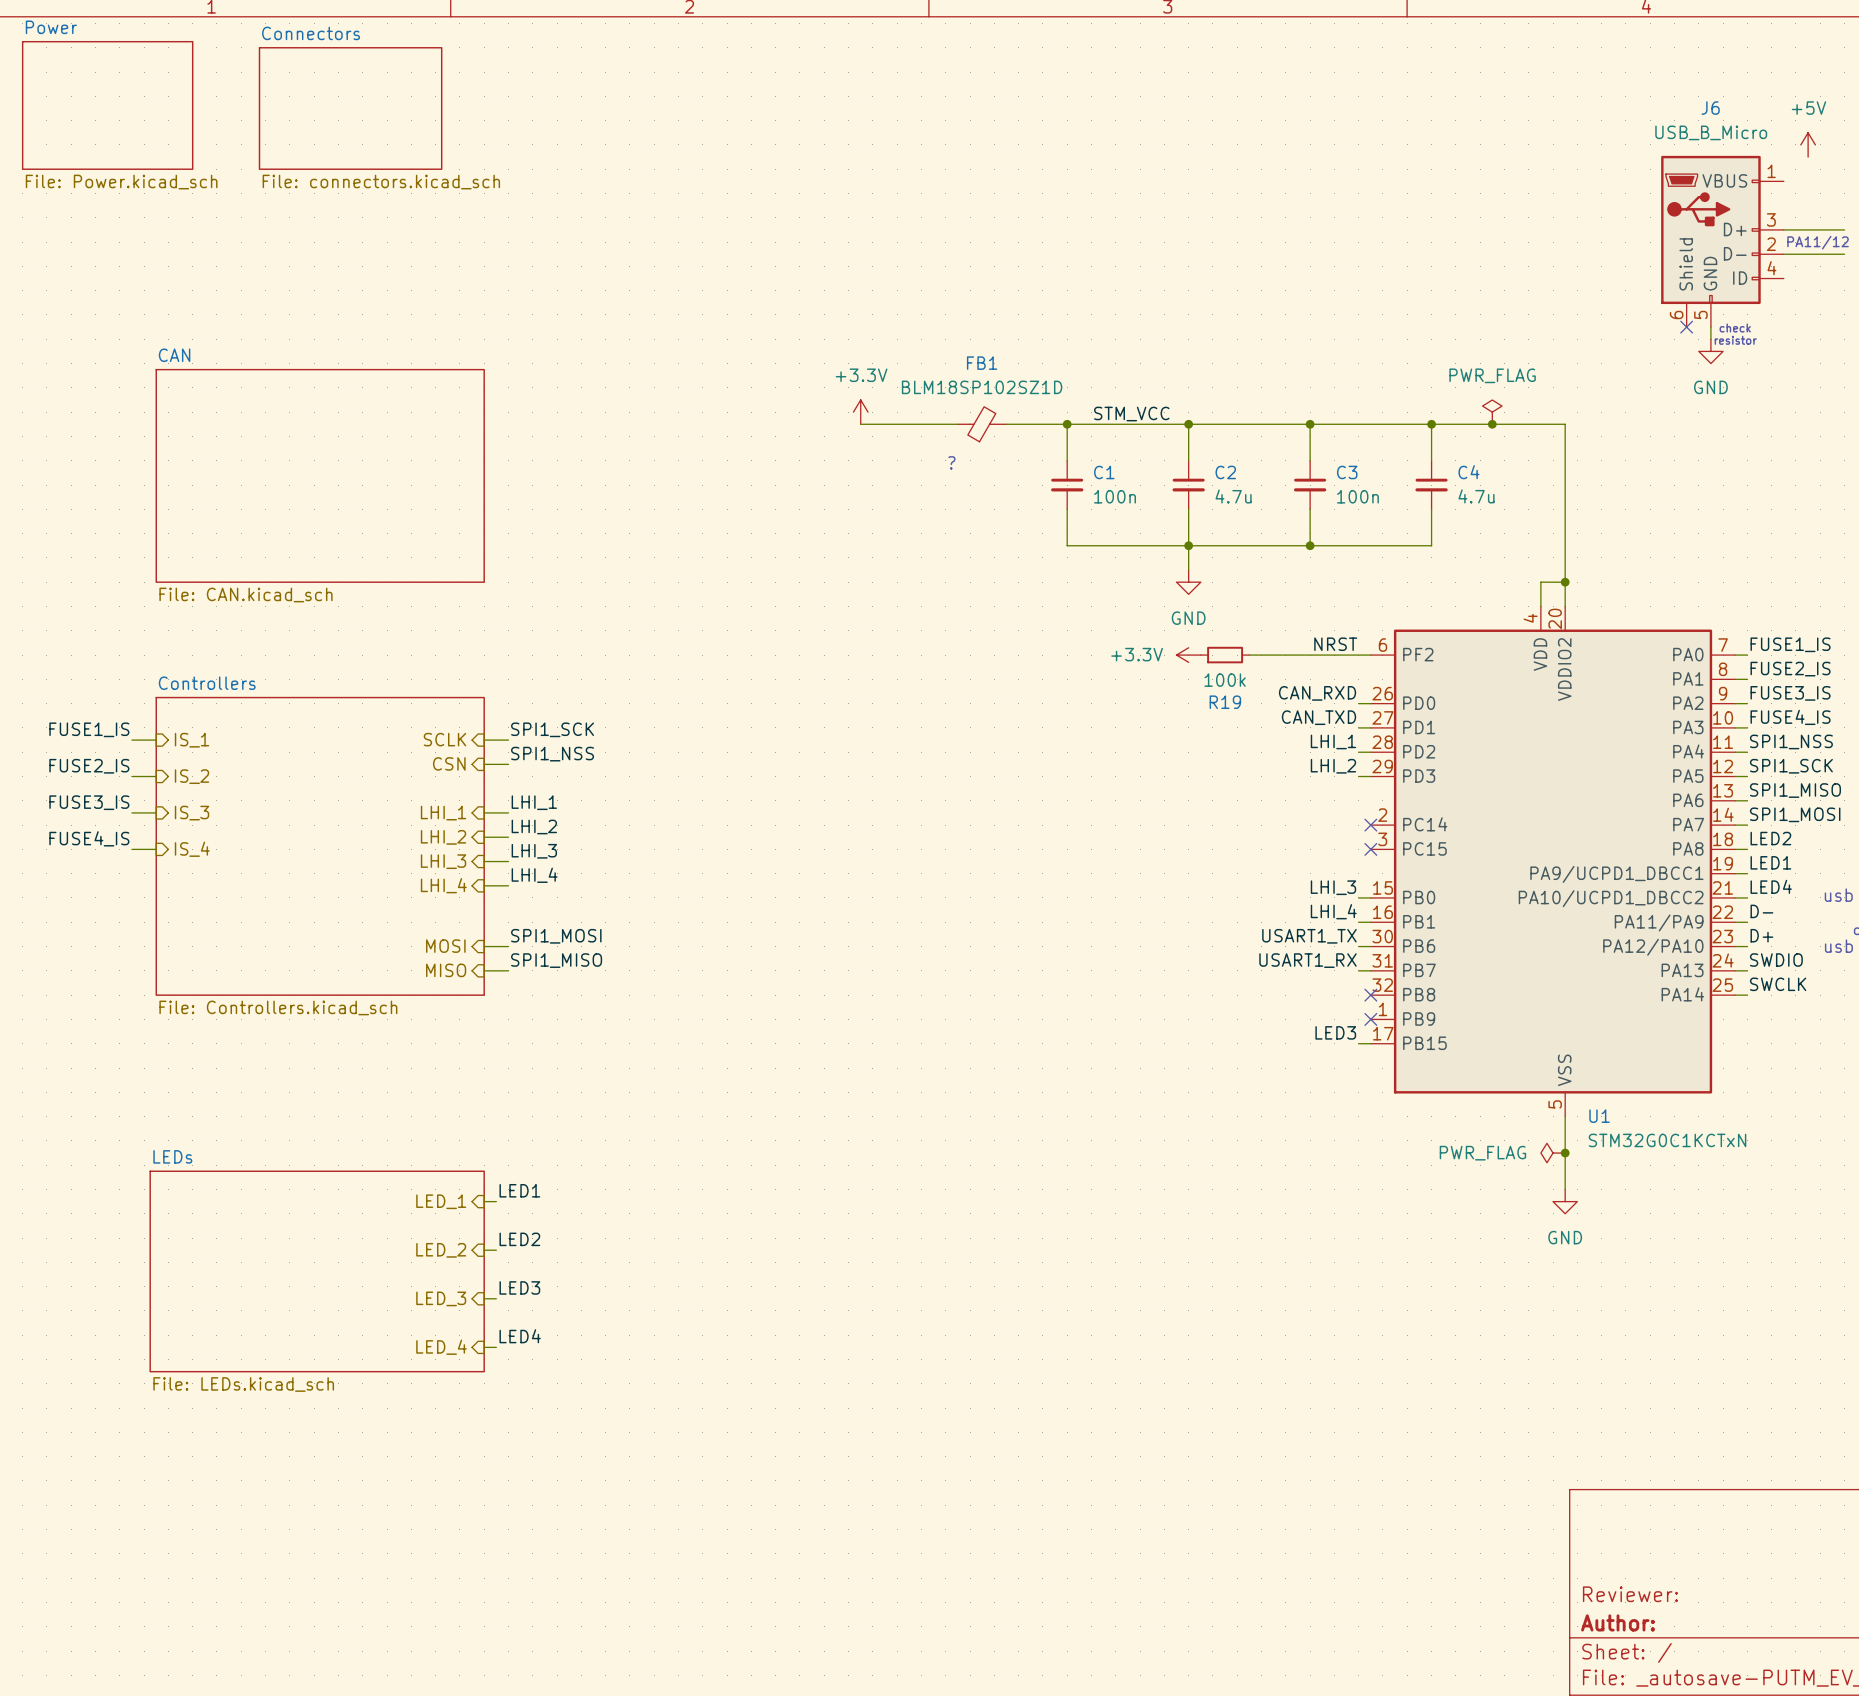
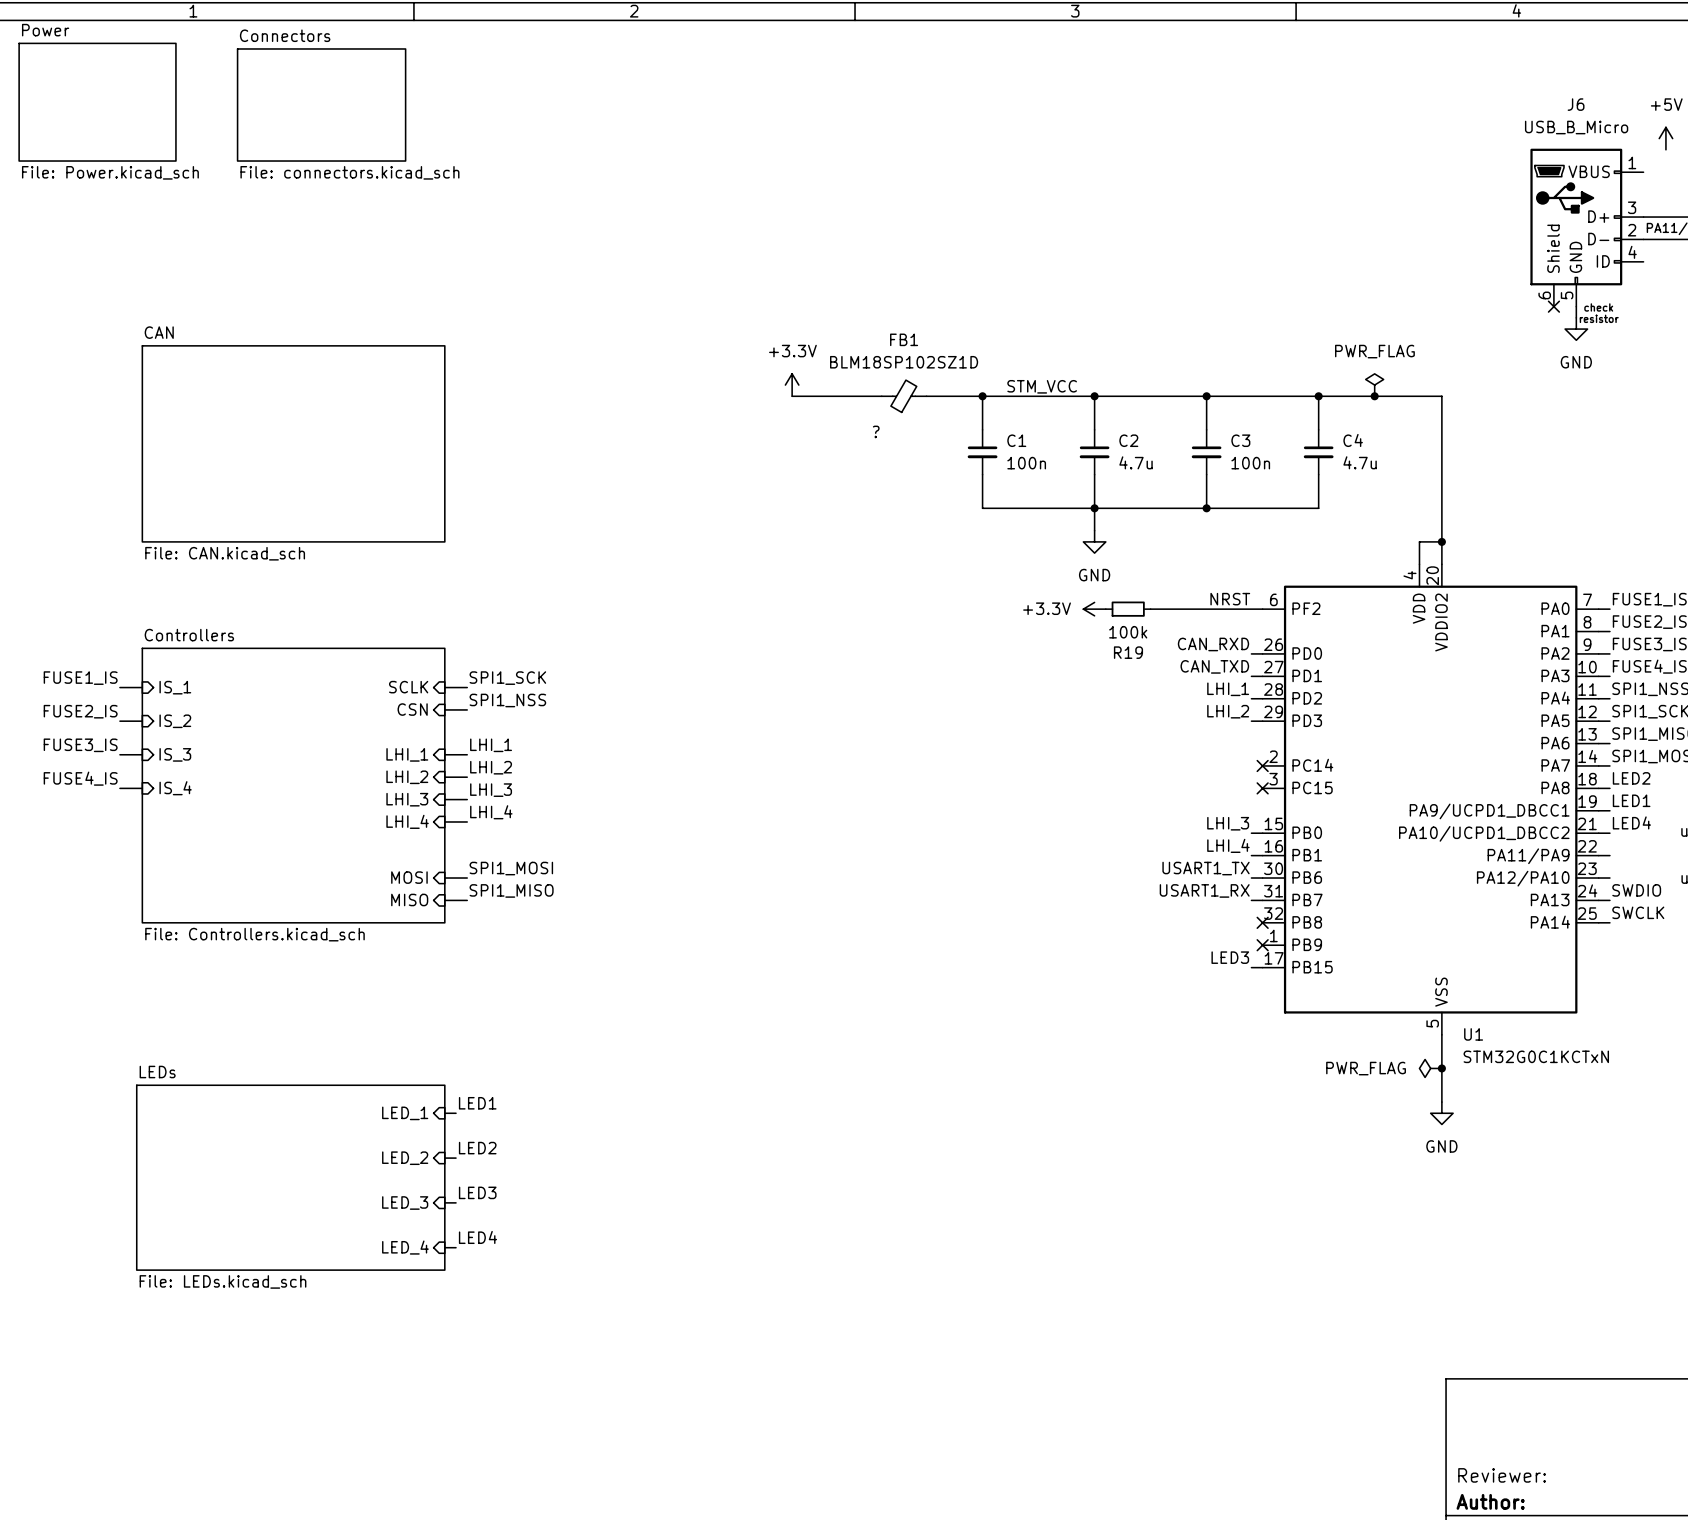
label: D- (1761, 911) -> none
label: D+ (1761, 935) -> none

